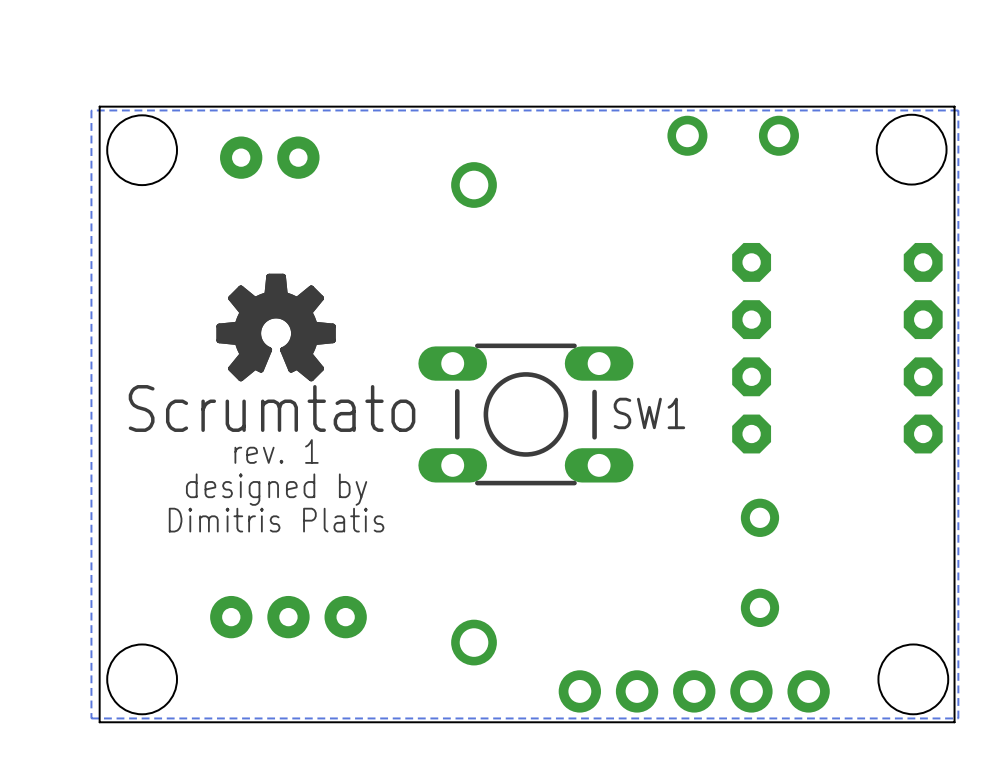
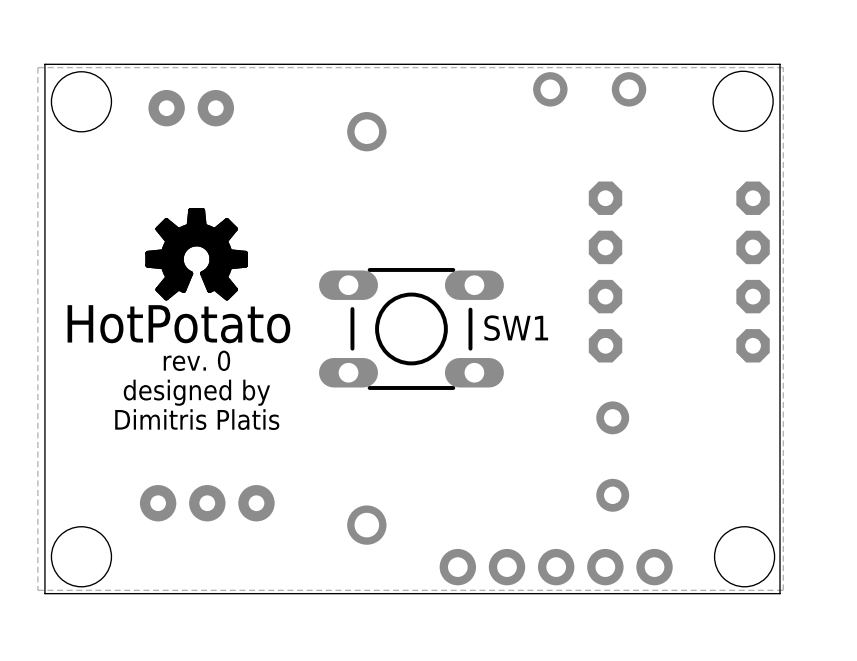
text: Scrumtato (272, 408) -> HotPotato (178, 324)
text: rev. 1 (276, 451) -> rev. 0 (196, 360)

